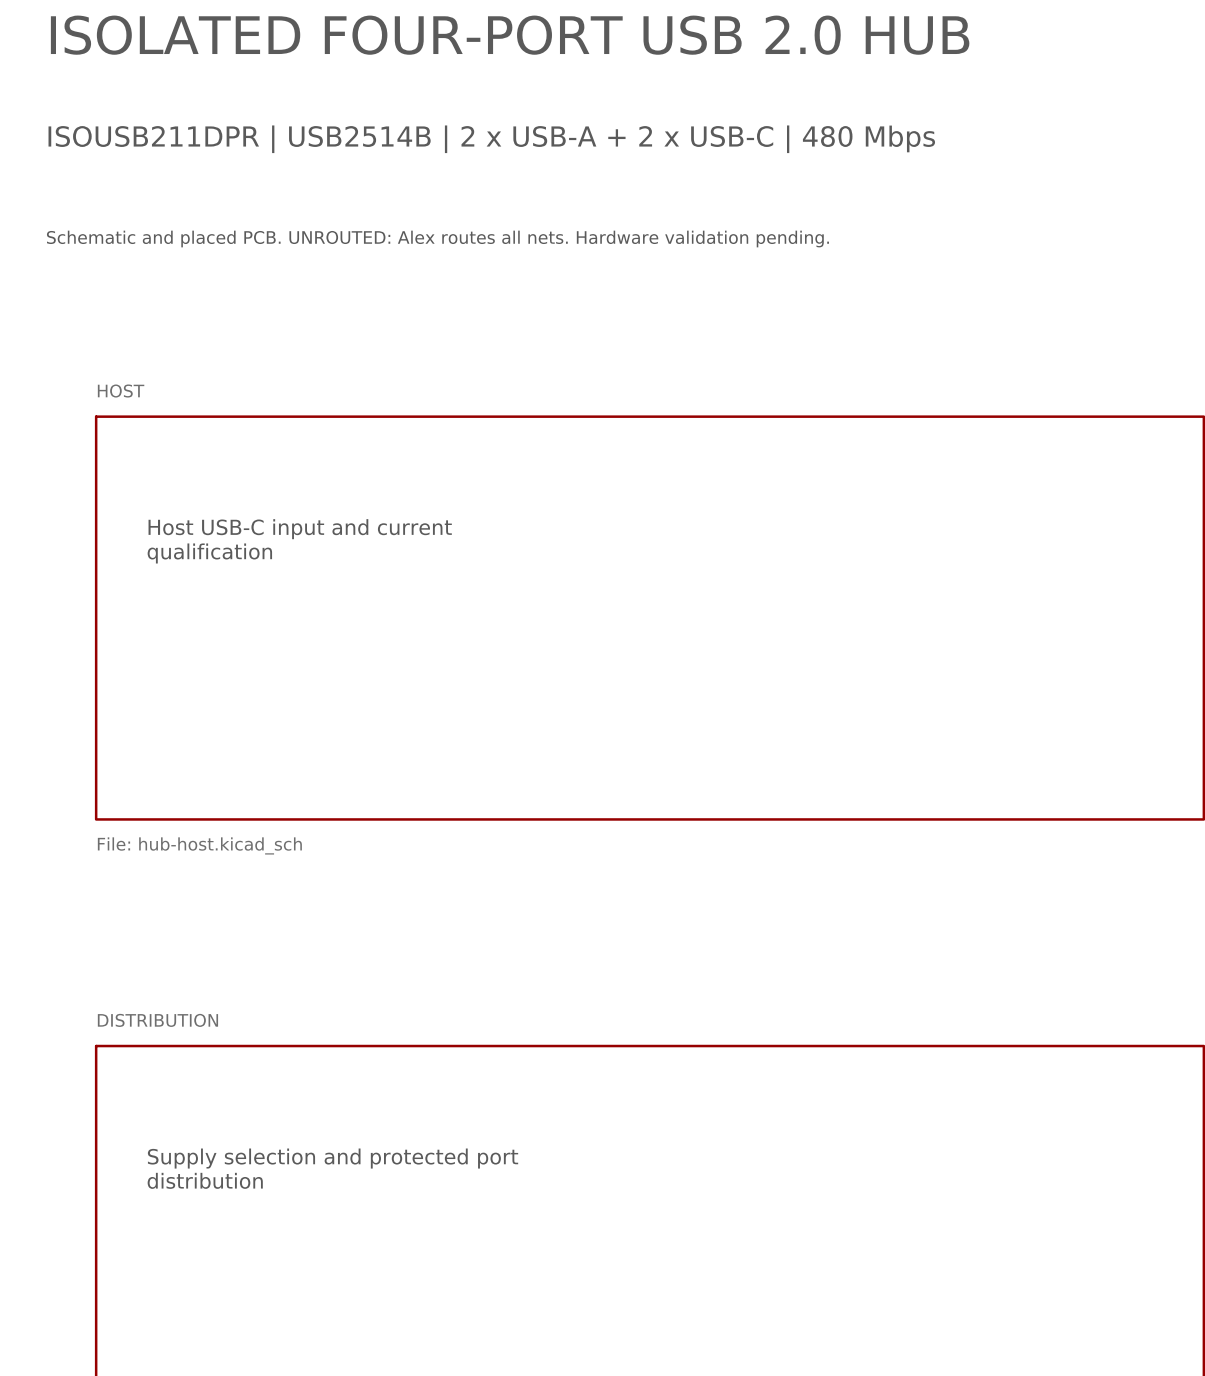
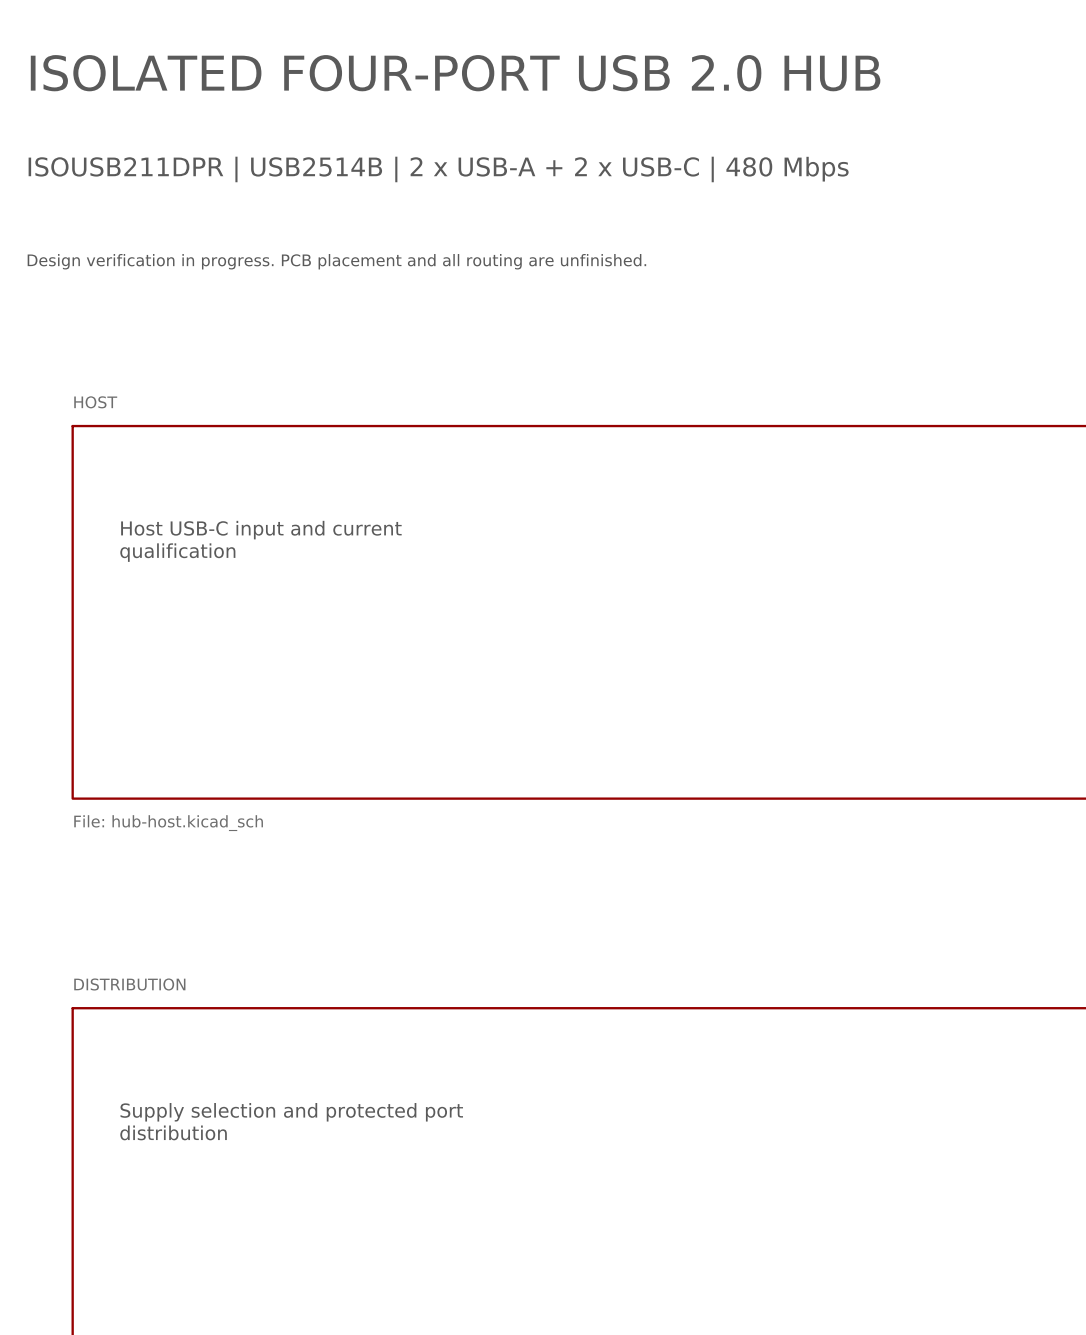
text: Schematic and placed PCB. UNROUTED: Alex routes all nets. Hardware validation pending. (437, 239) -> Design verification in progress. PCB placement and all routing are unfinished. (336, 261)

